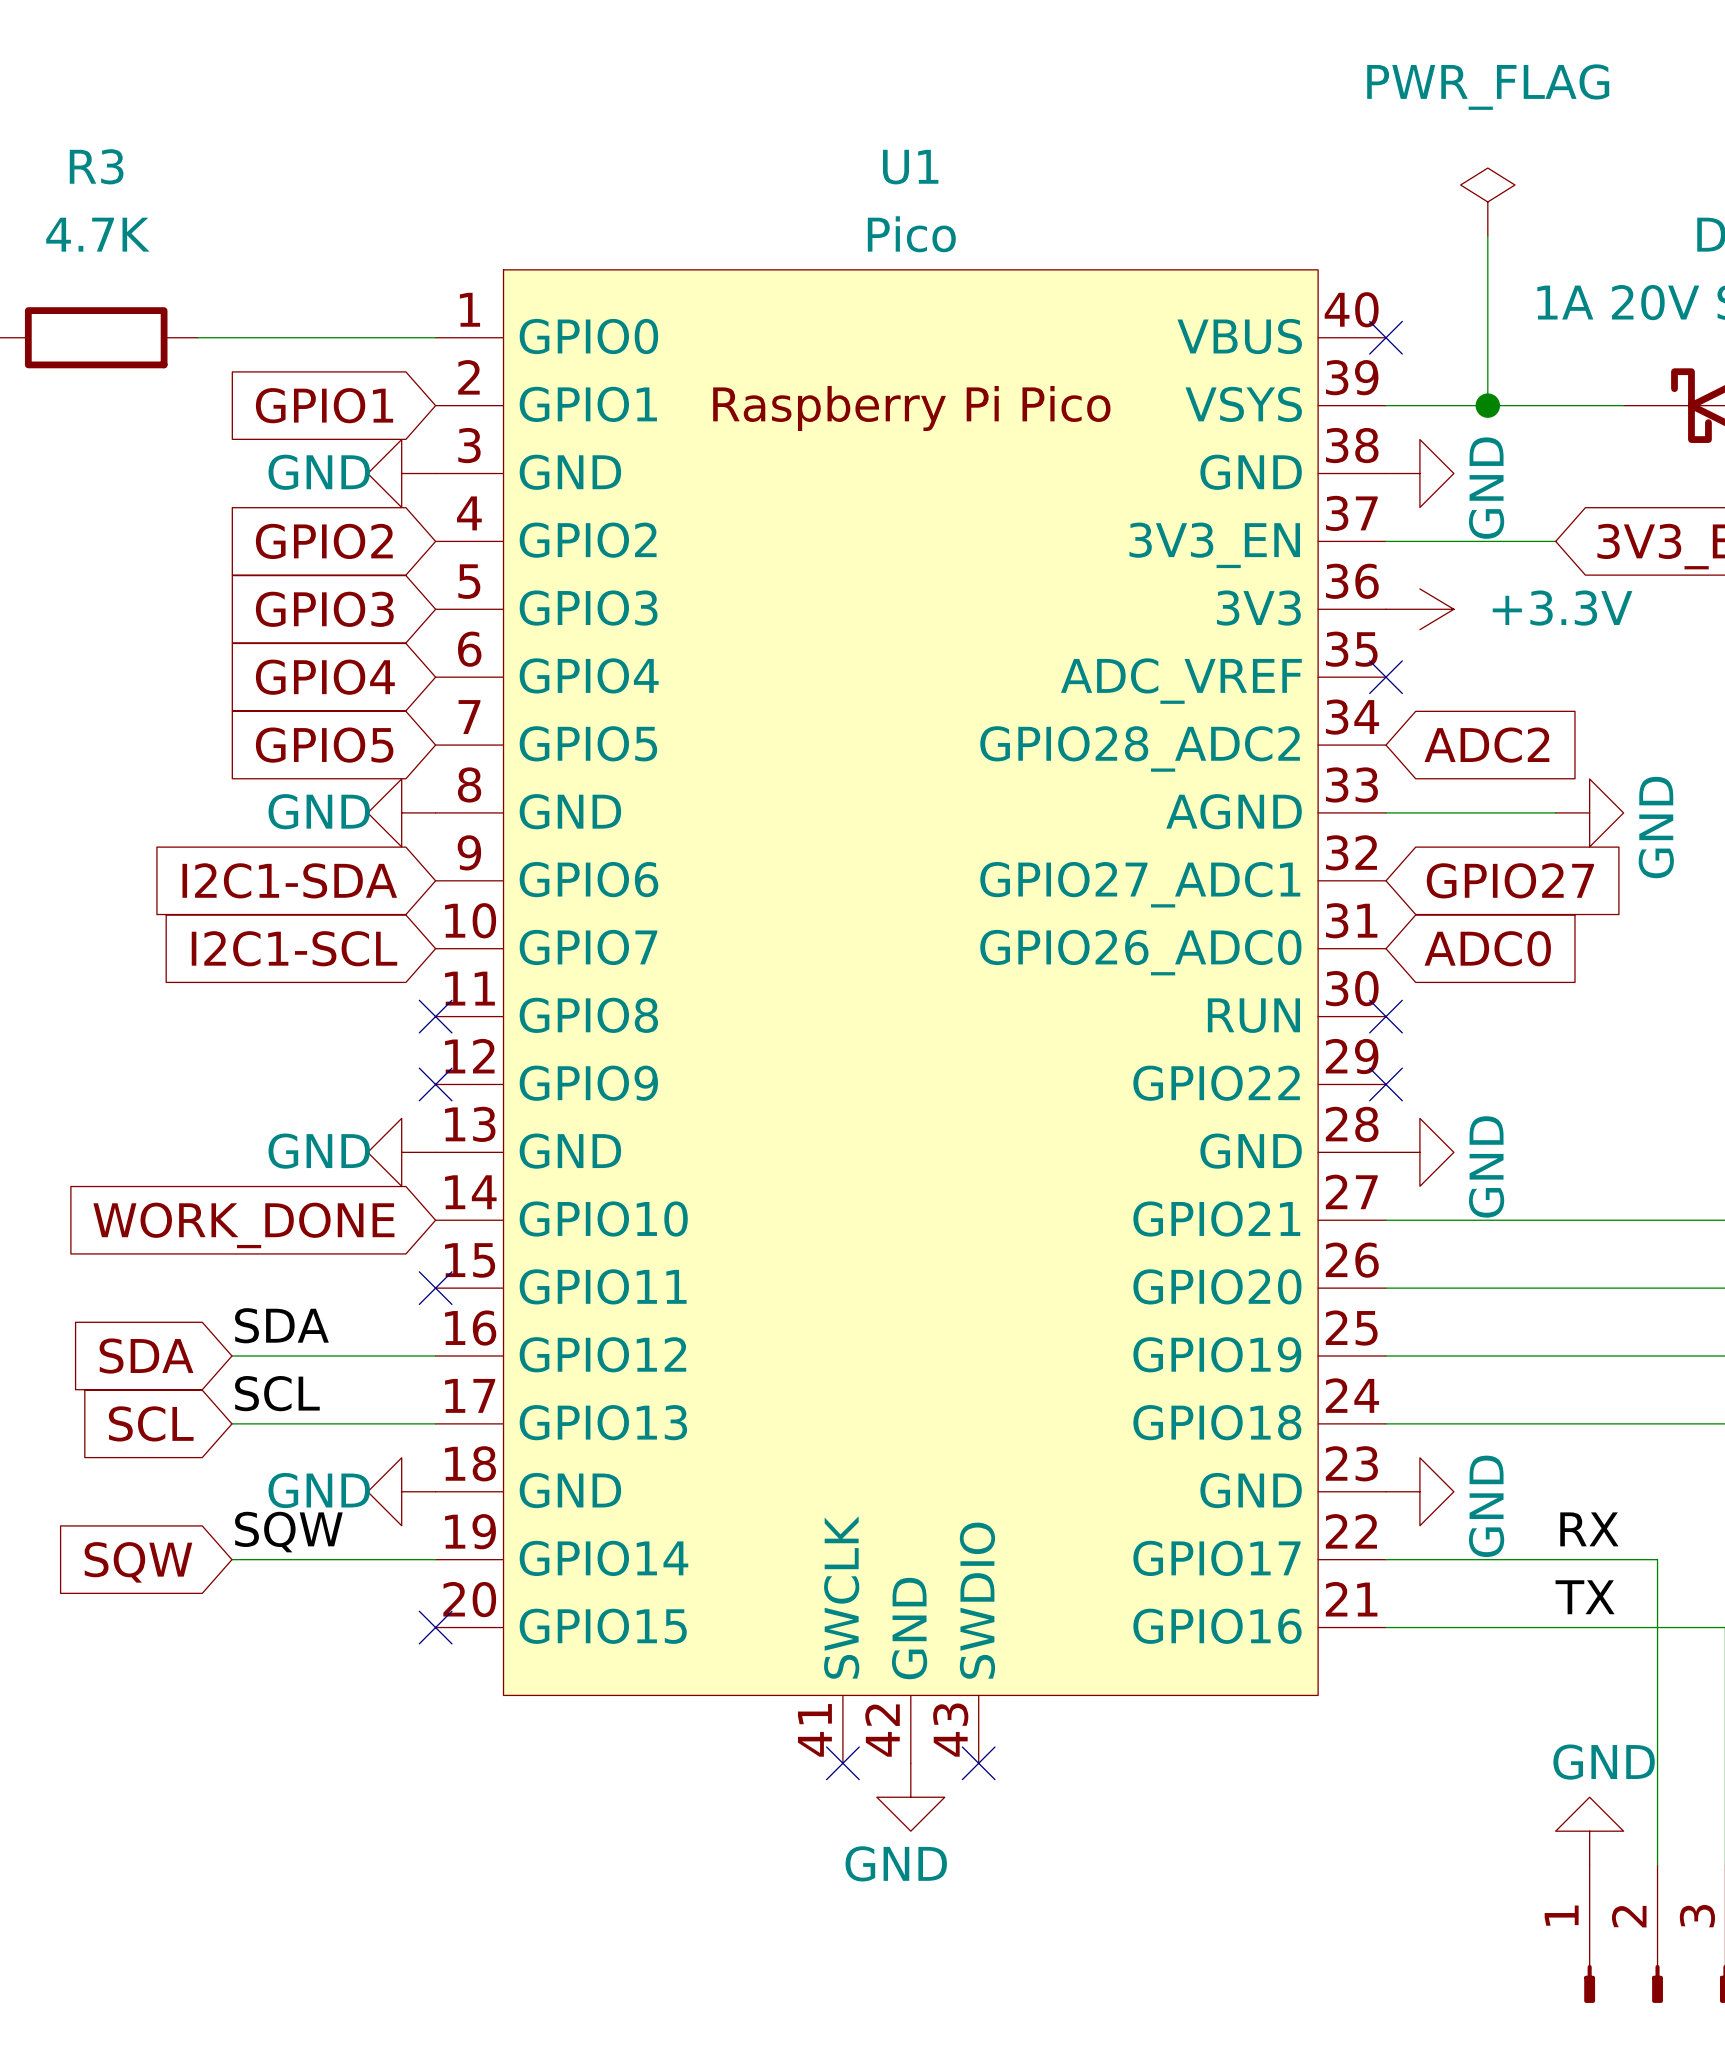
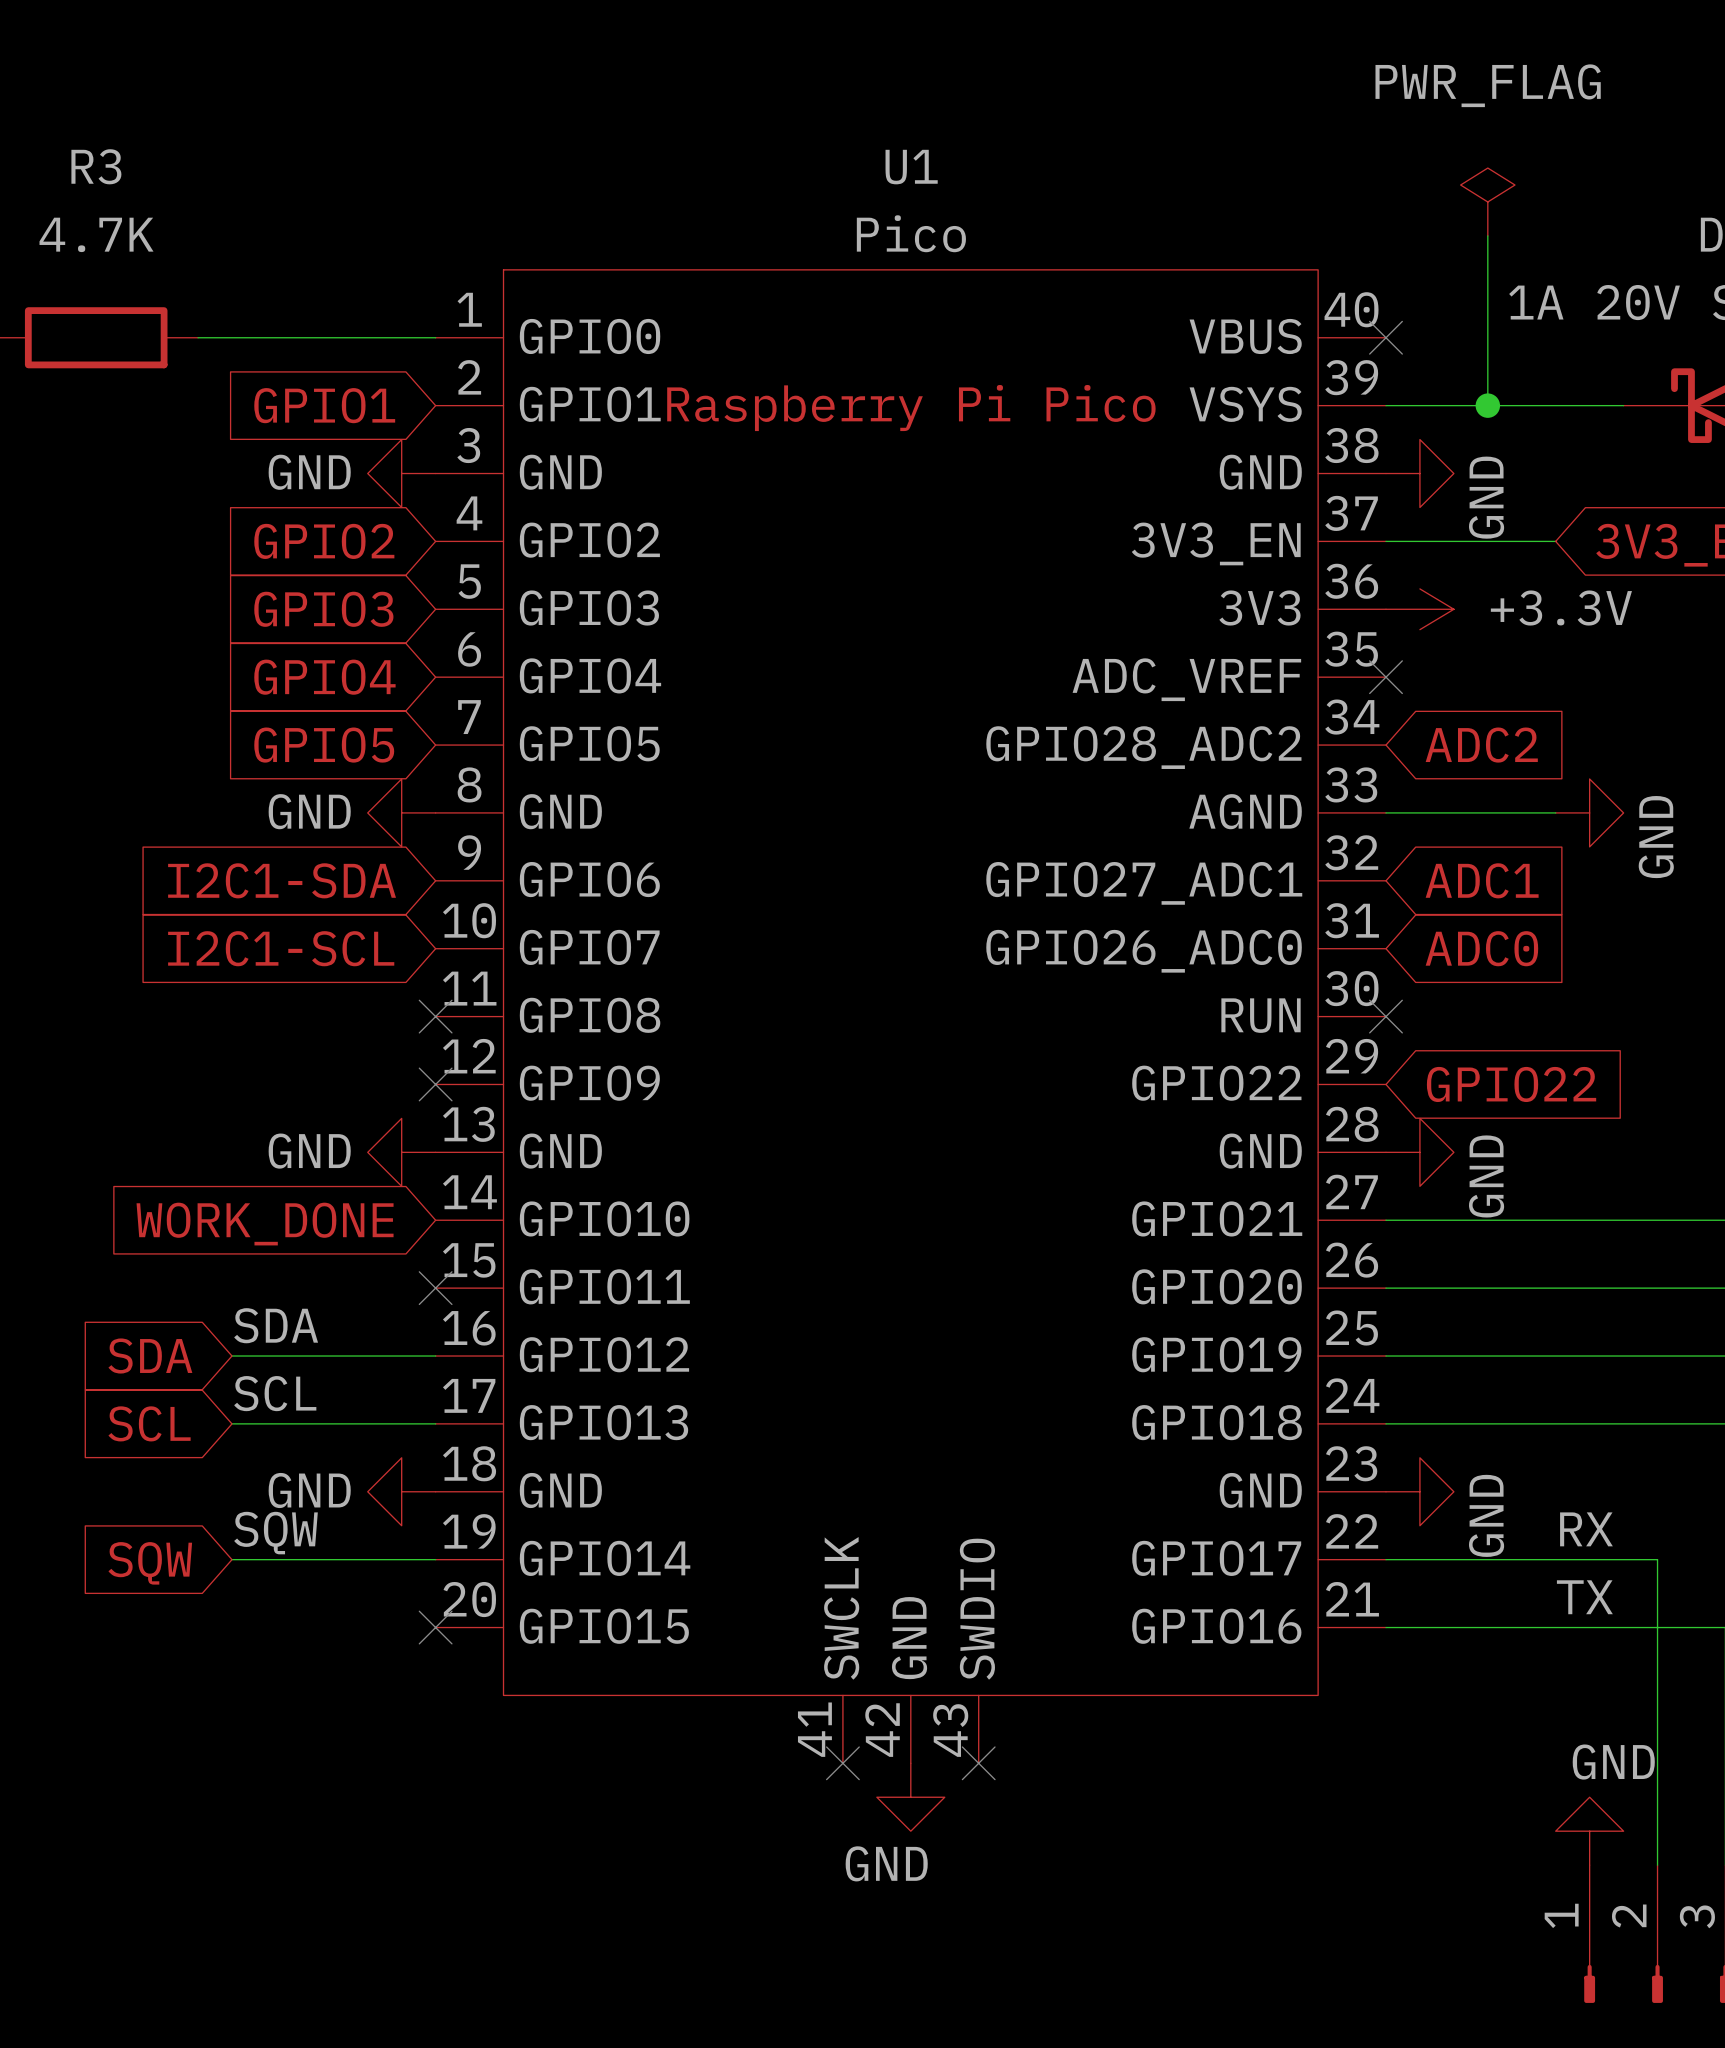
global label: GPIO27 (1510, 880) -> ADC1 (1482, 880)
no-connect mark: (1385, 1084) -> none
global label: none -> GPIO22 (1511, 1084)

